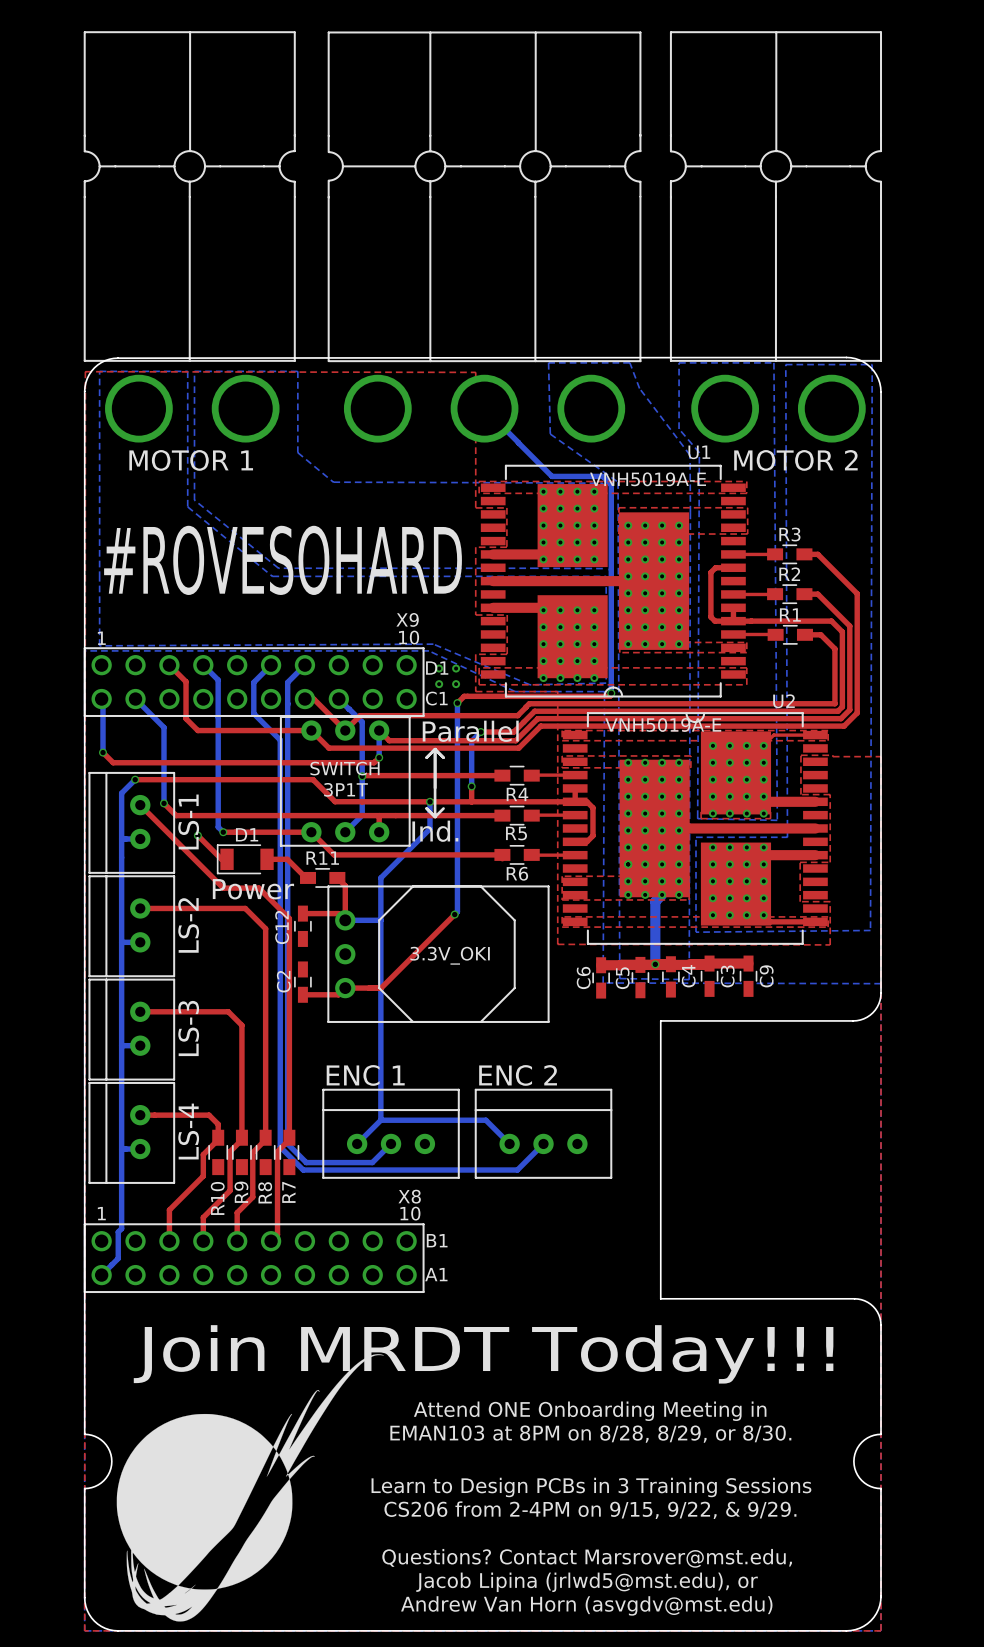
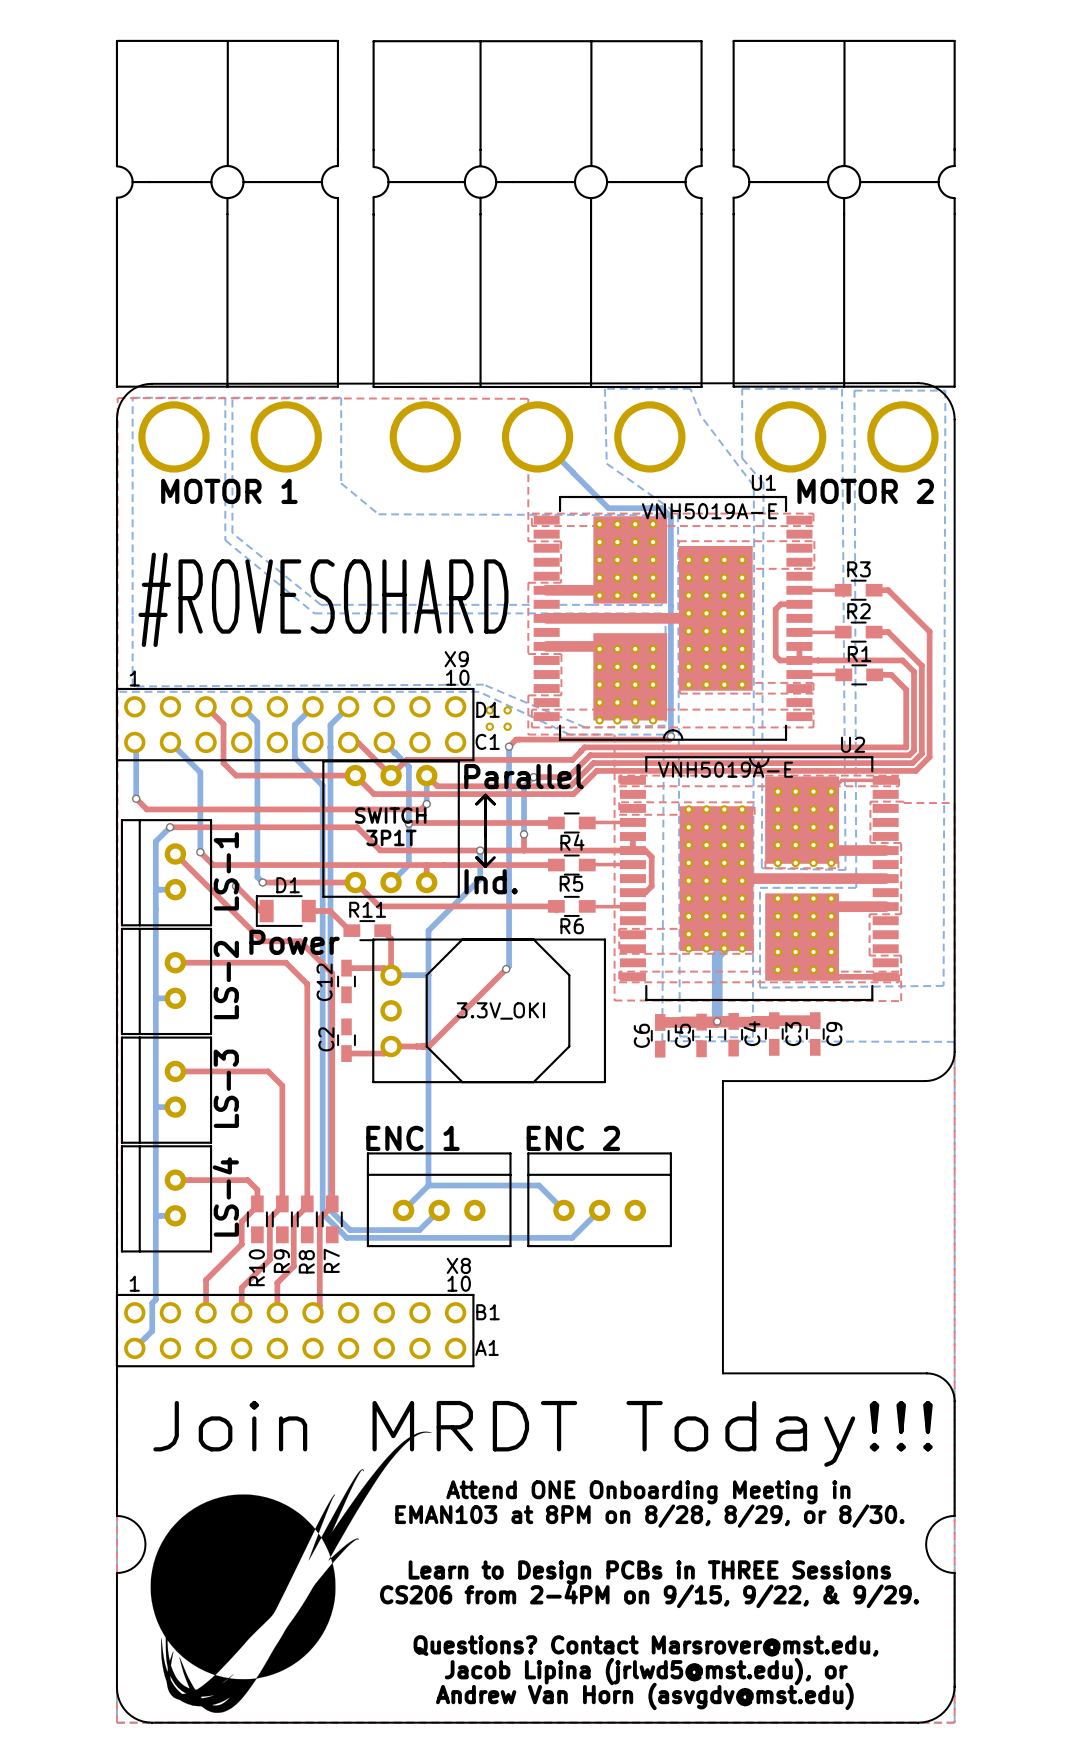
text: Learn to Design PCBs in 3 Training Sessions (591, 1487) -> Learn to Design PCBs in THREE Sessions (649, 1572)

